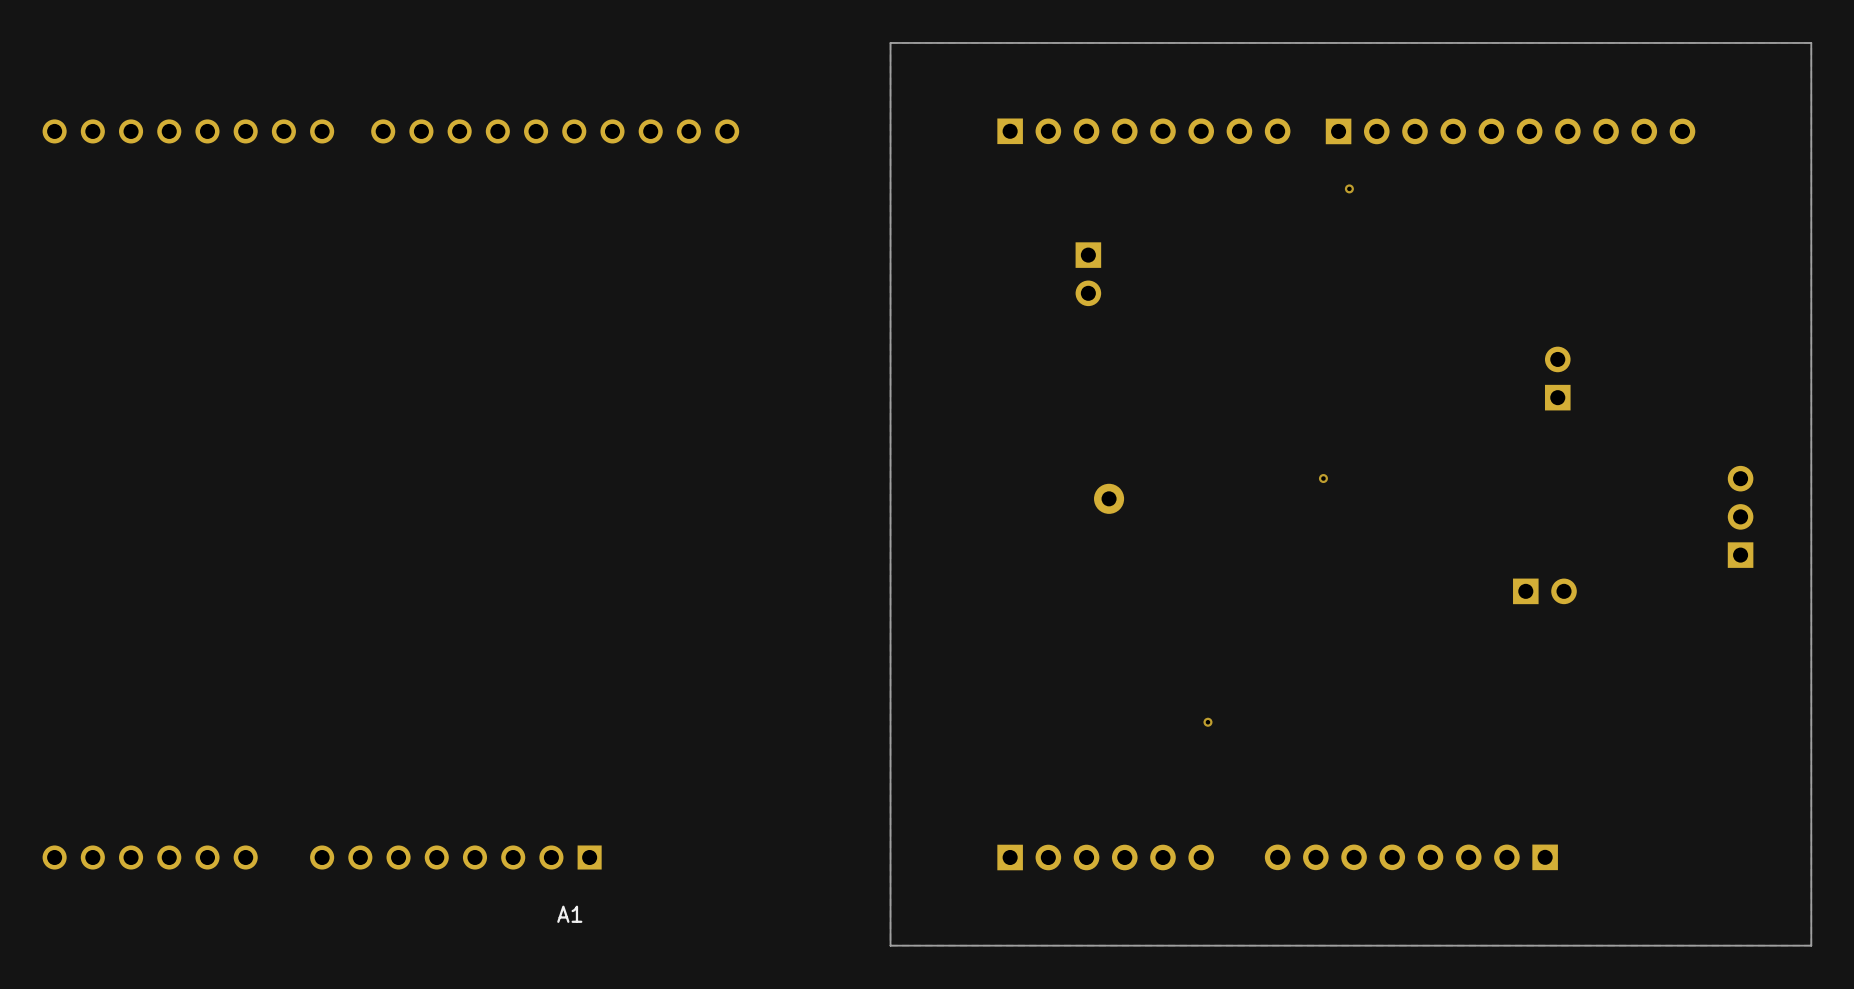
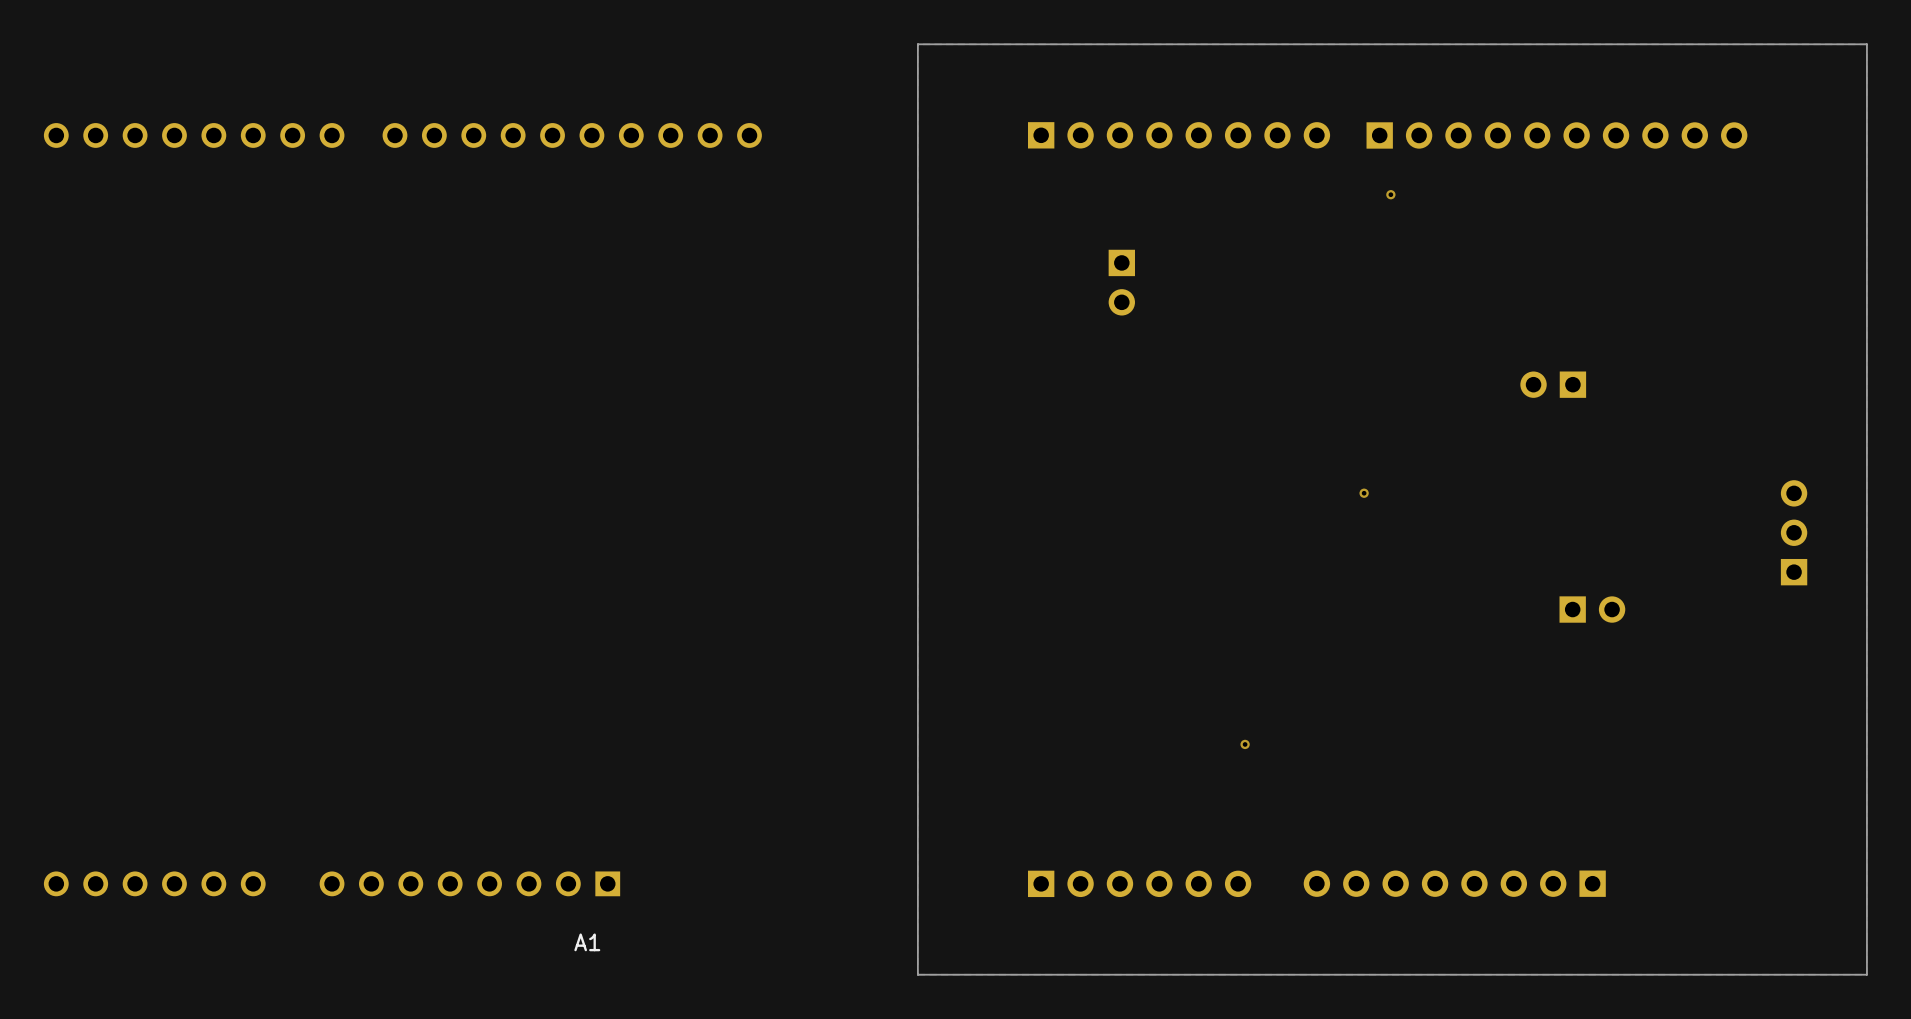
part rotation: 0° (1557, 378) -> 90° counterclockwise (1553, 384)
part position: (1557, 378) -> (1553, 384)
part: (1109, 498) -> none

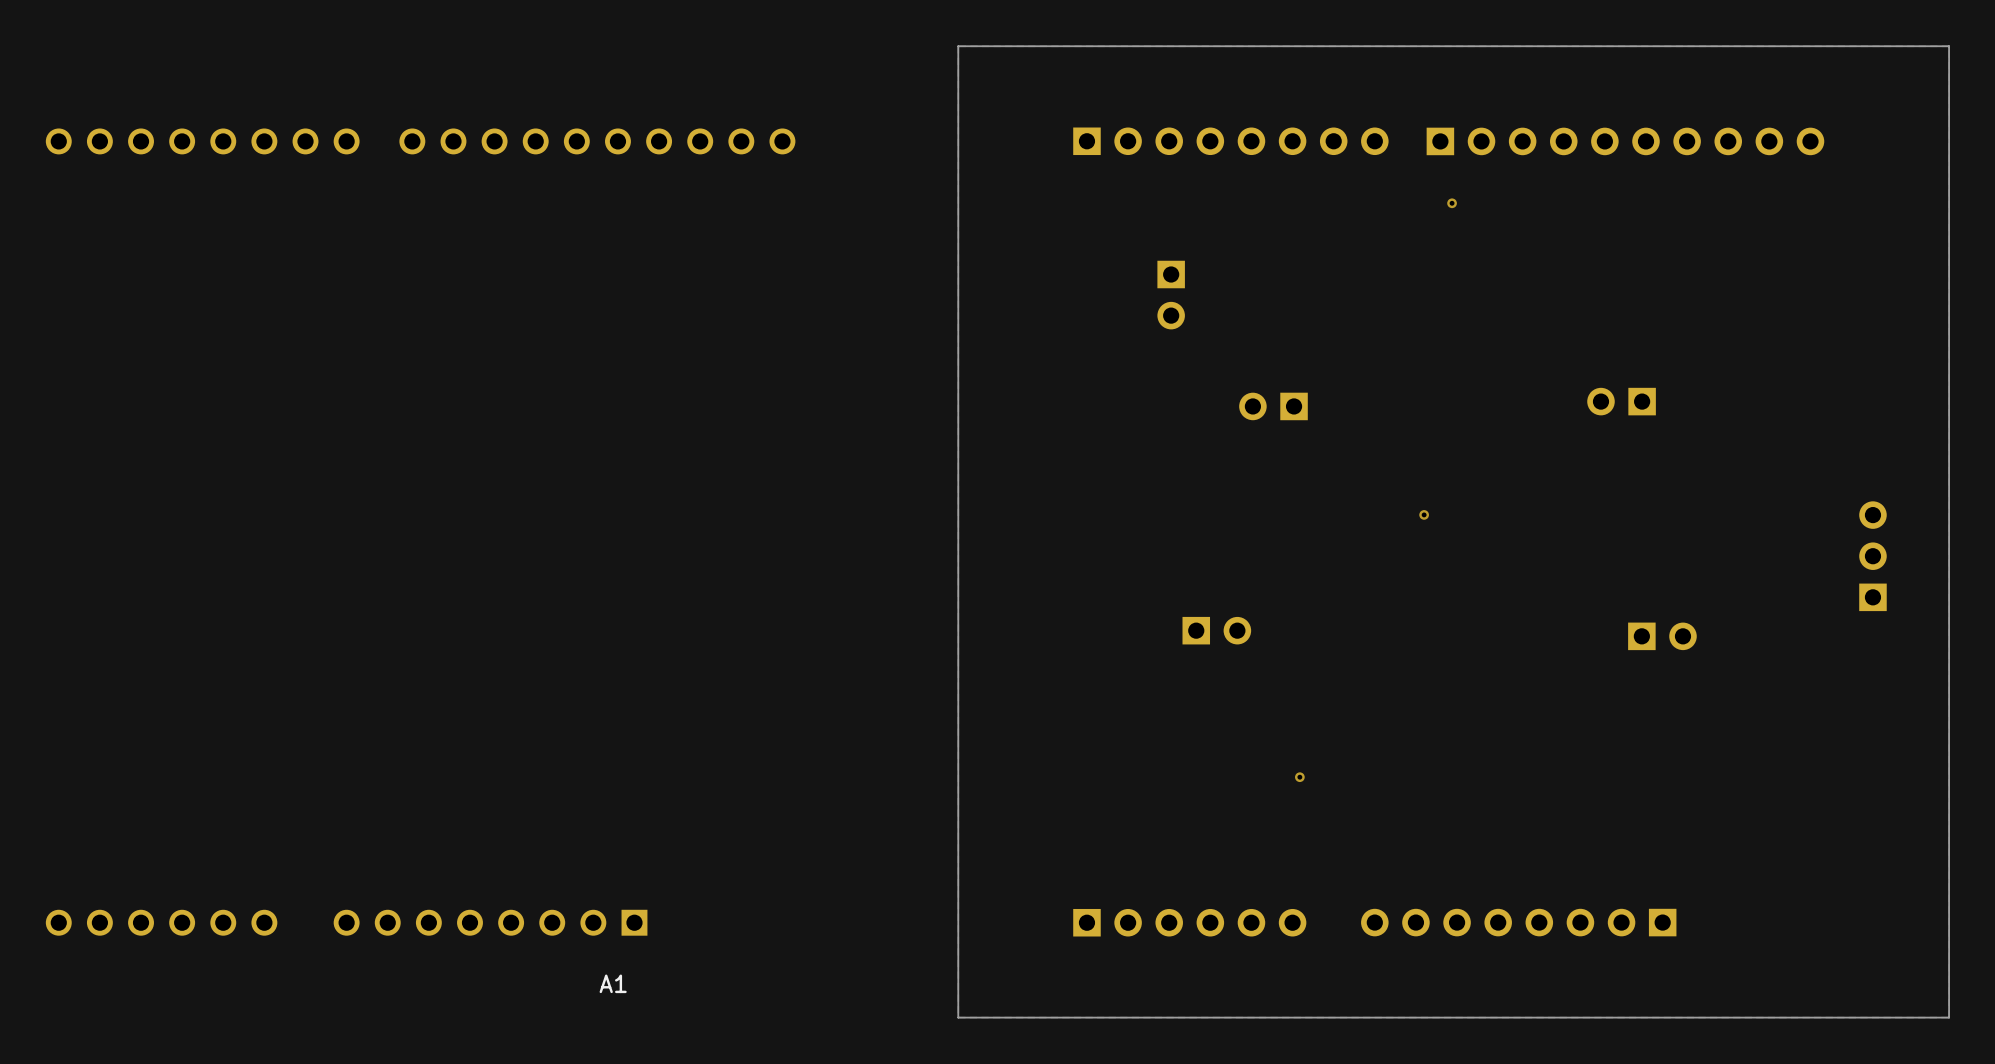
part: none -> (1273, 406)
part: none -> (1216, 630)

